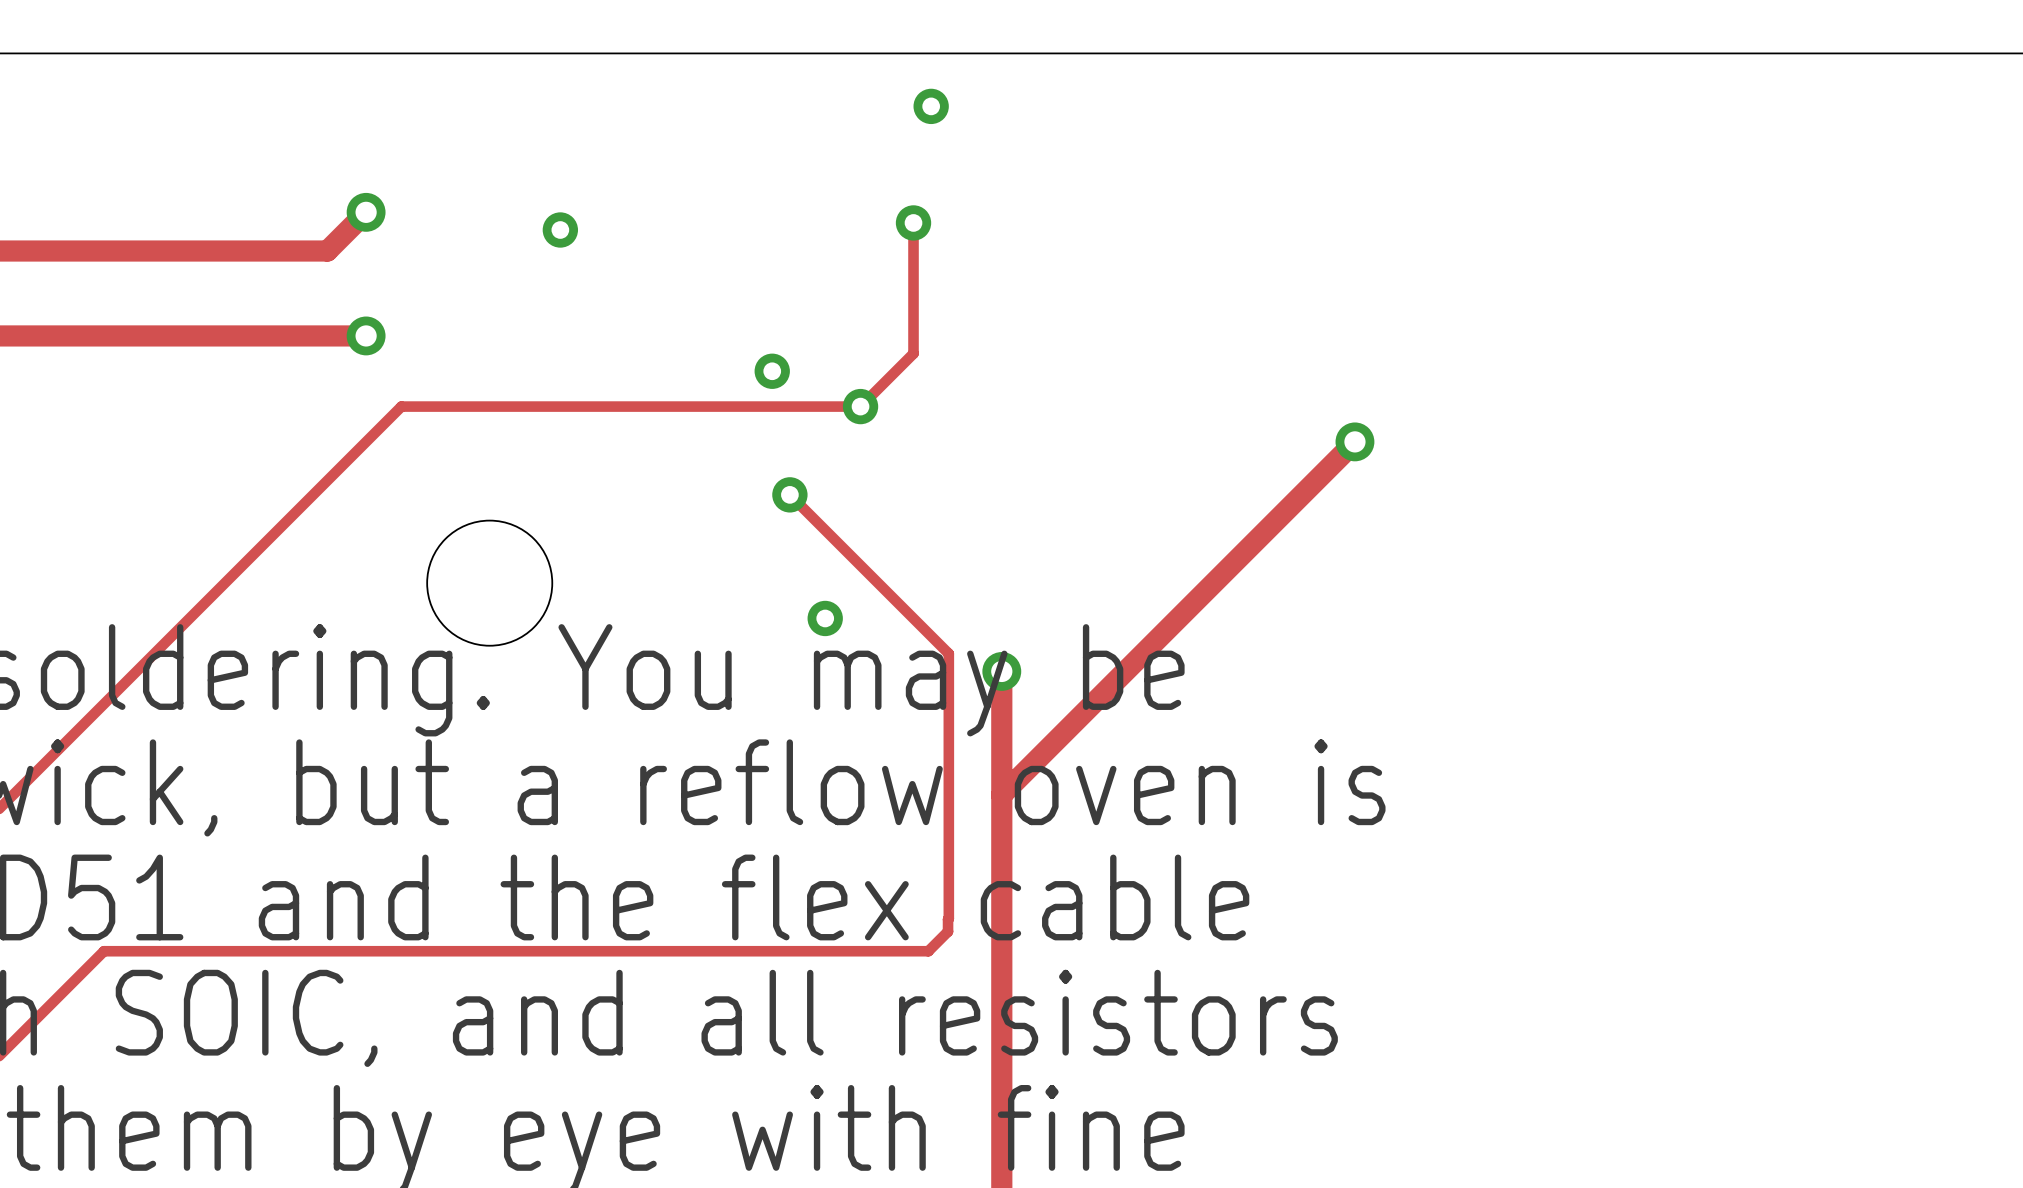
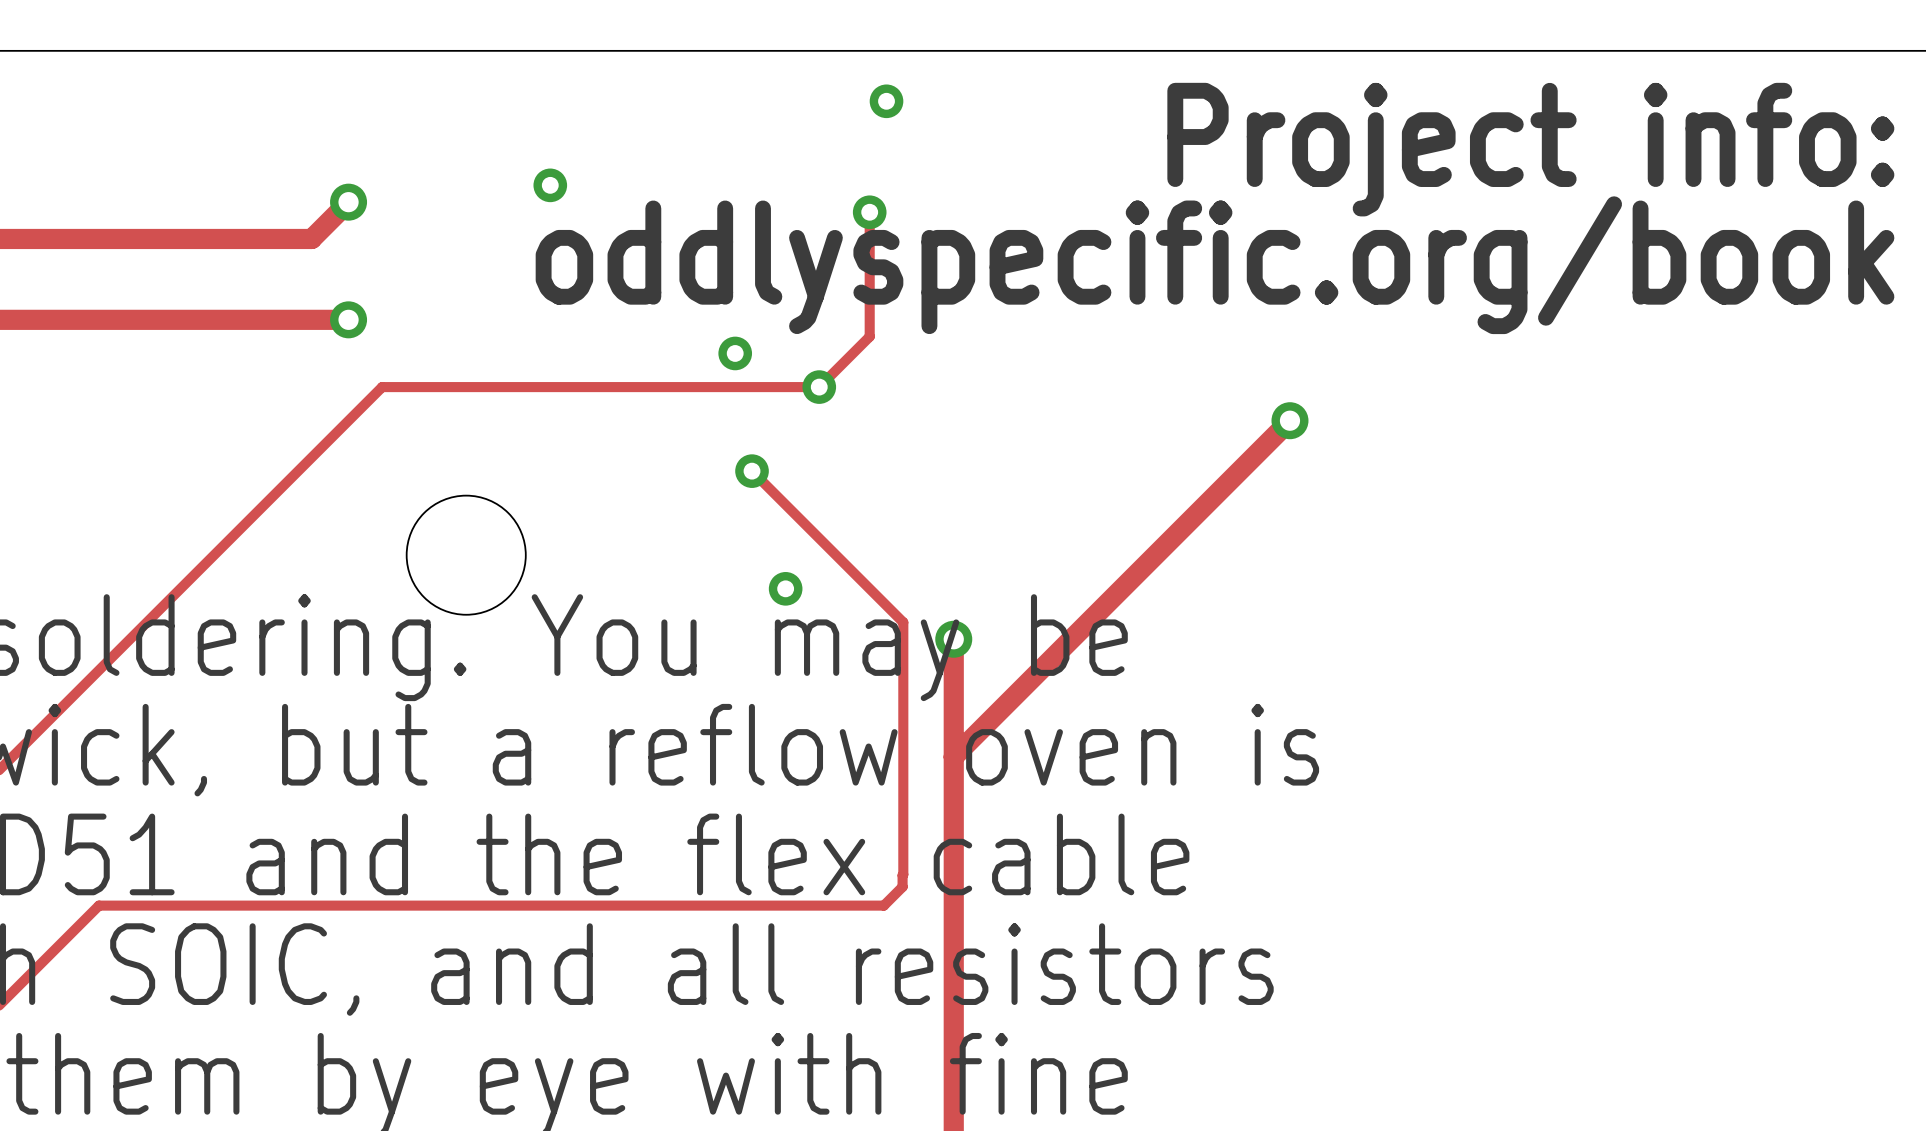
text: none -> Project info: (1530, 149)
via position: (560, 230) -> (550, 185)
text: none -> oddlyspecific.org/book (1215, 265)

